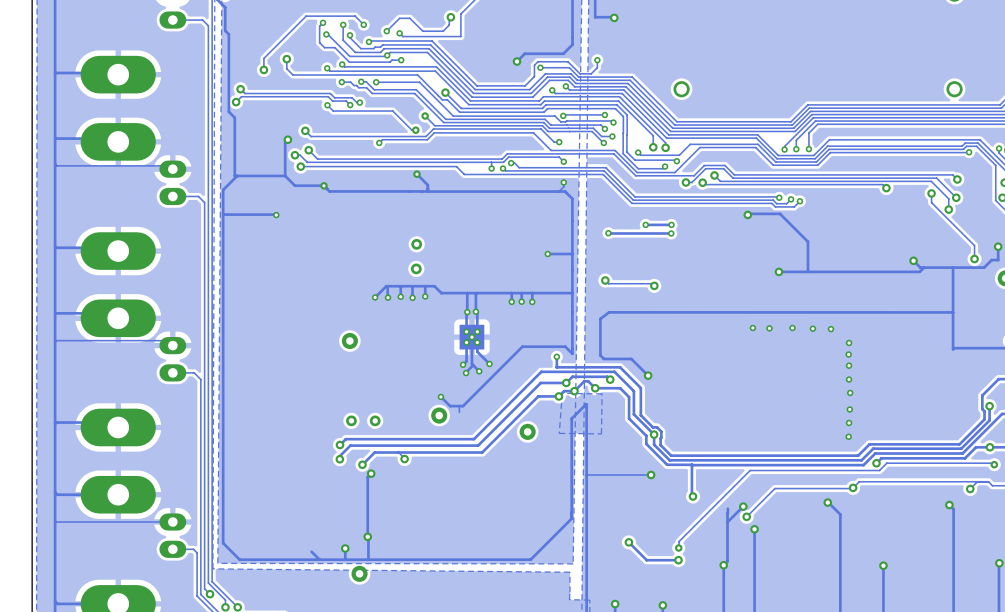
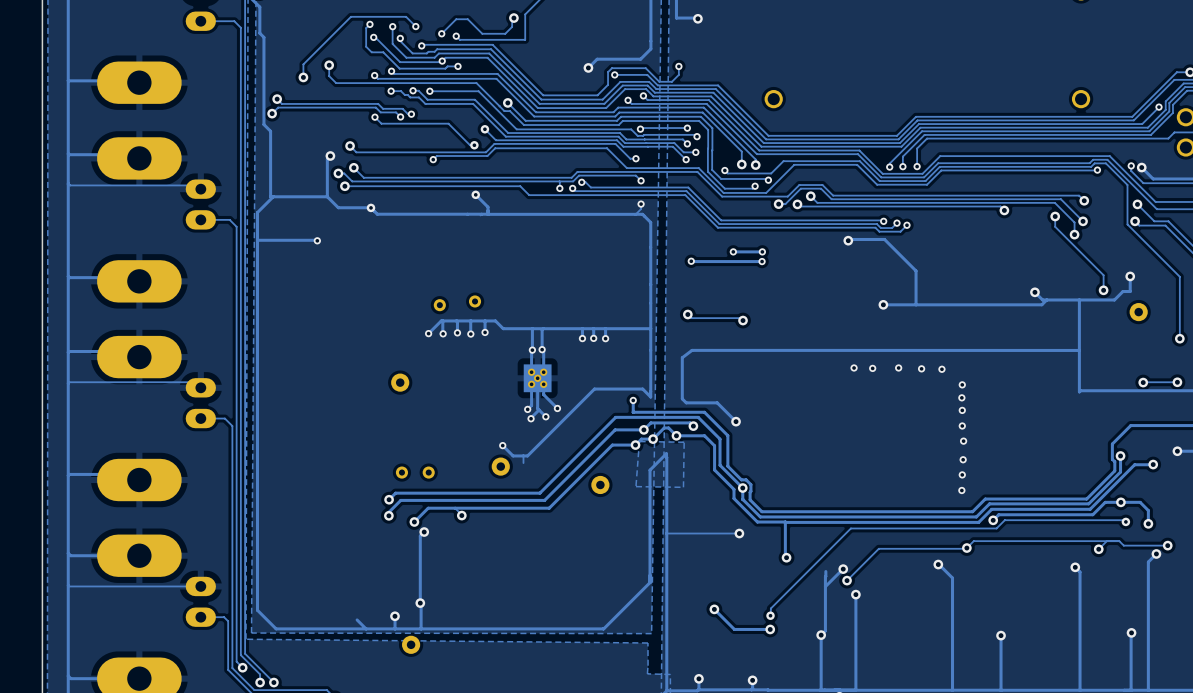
part position: (416, 244) -> (439, 305)
via: (547, 254) -> none
track: (572, 254) (547, 254) -> none

